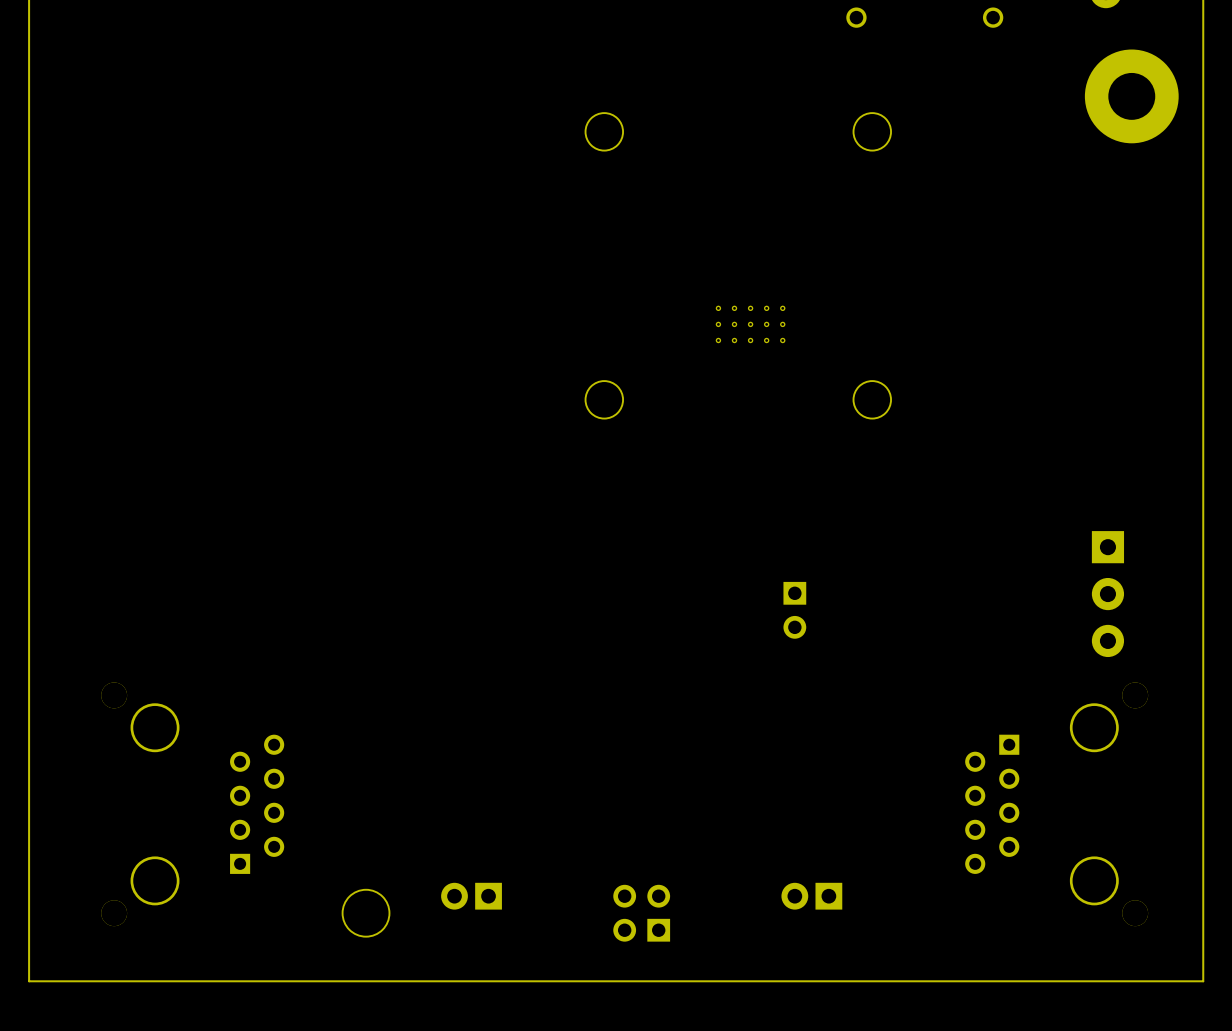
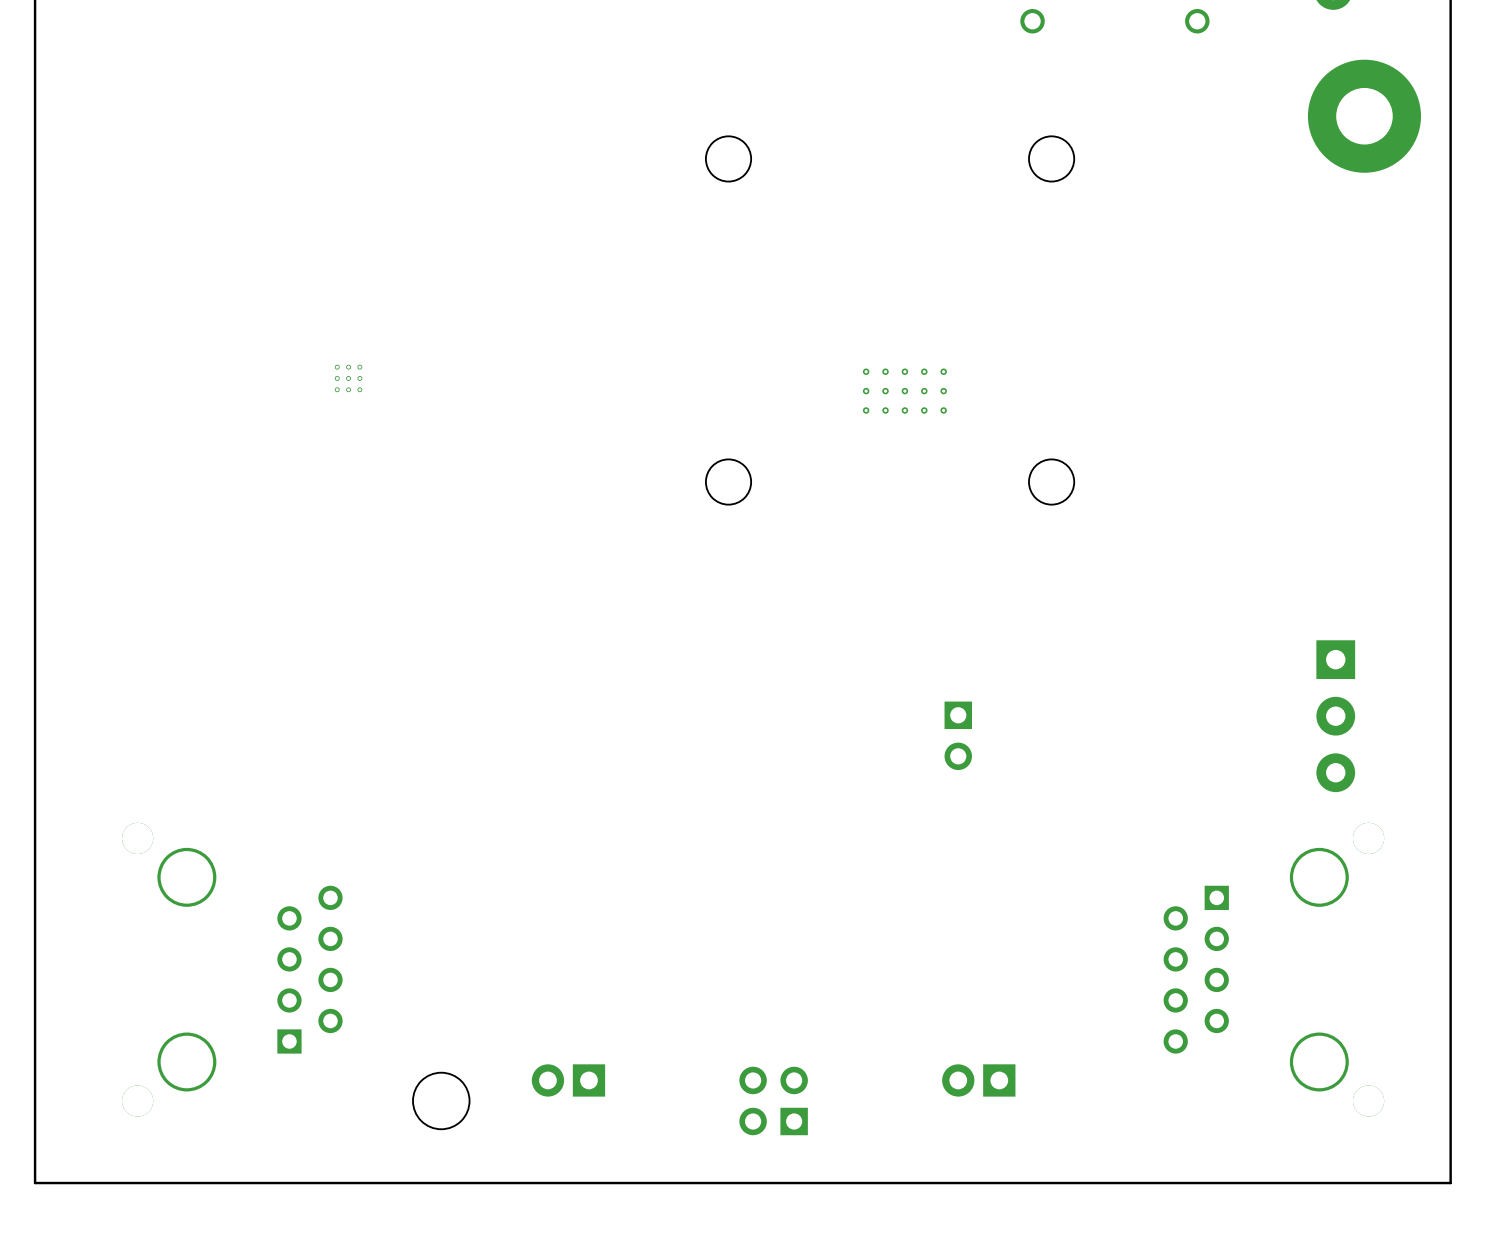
part: none -> (348, 378)

